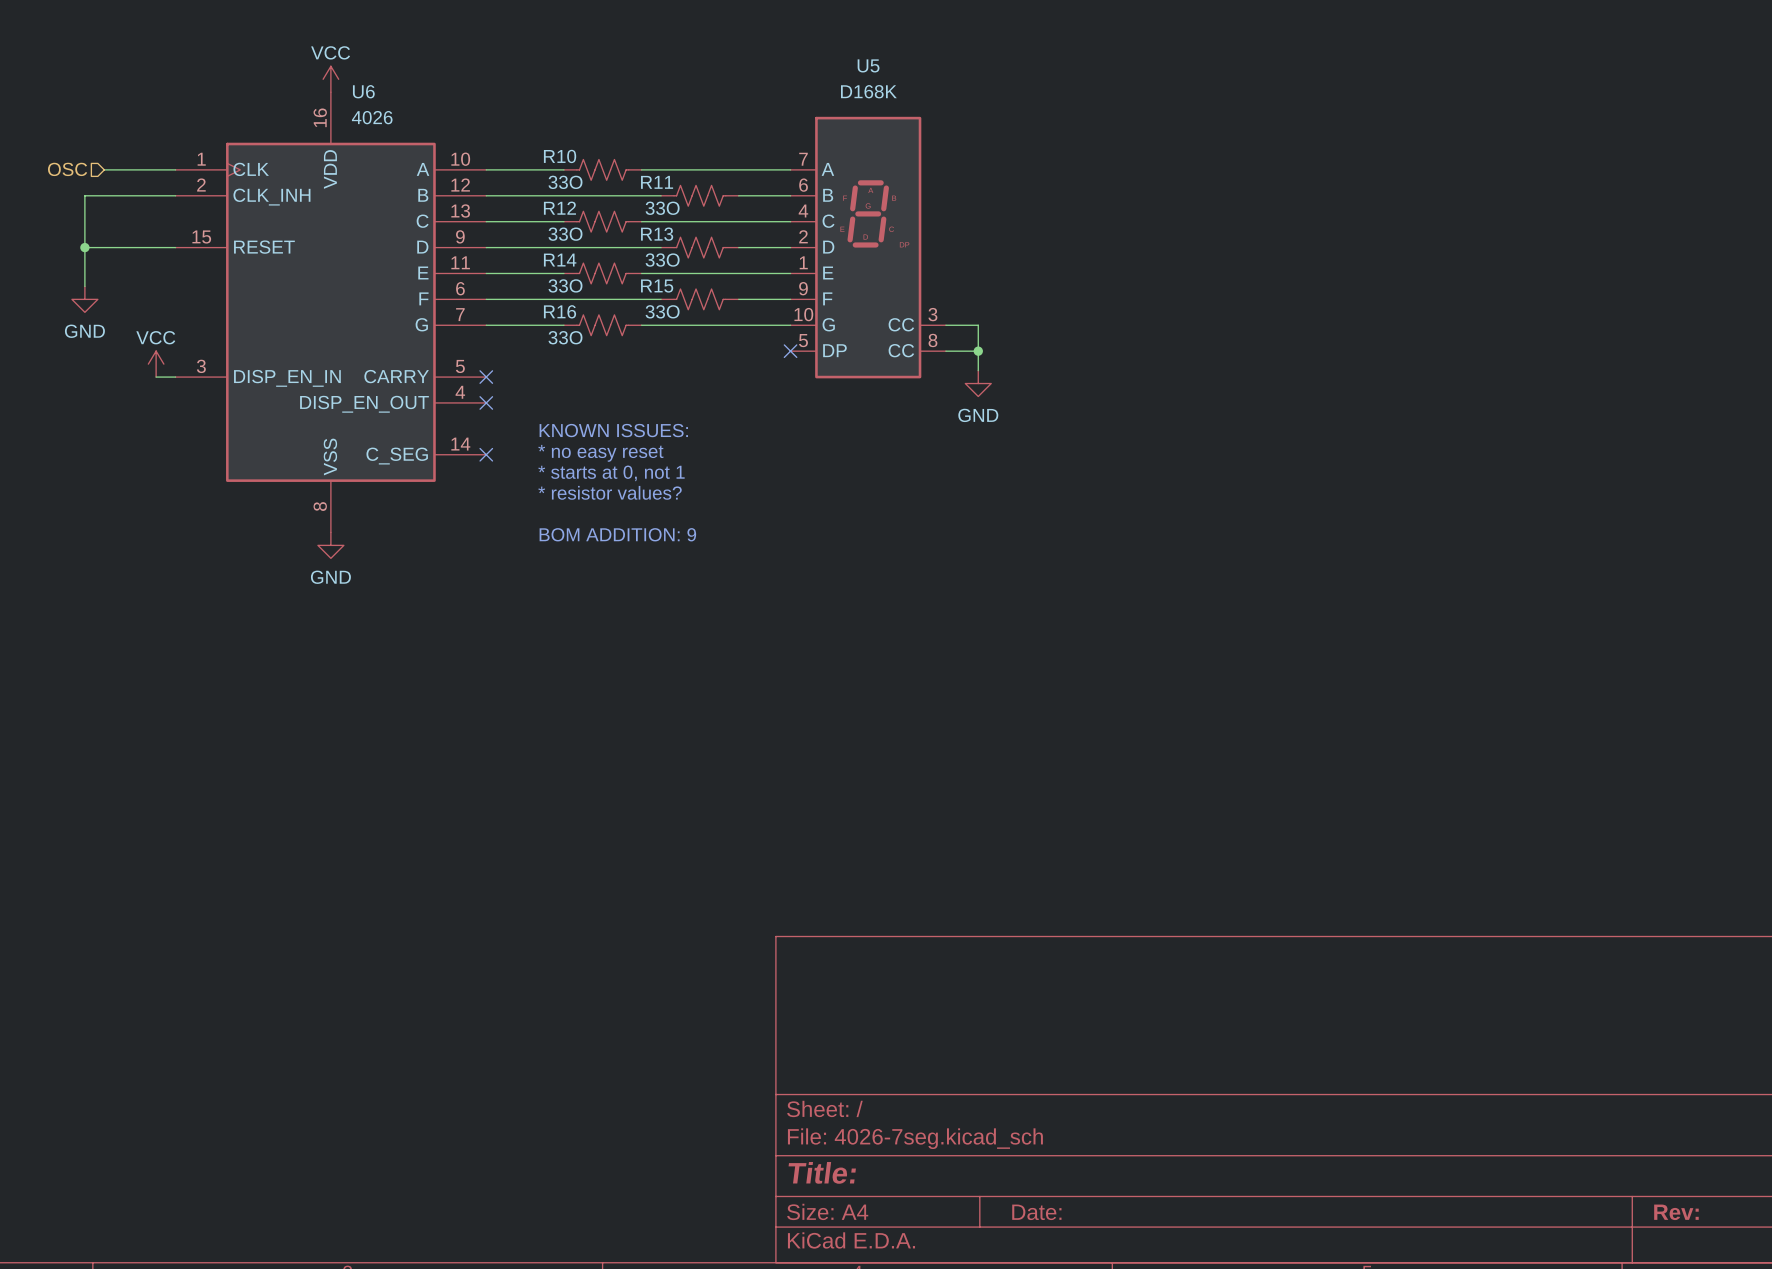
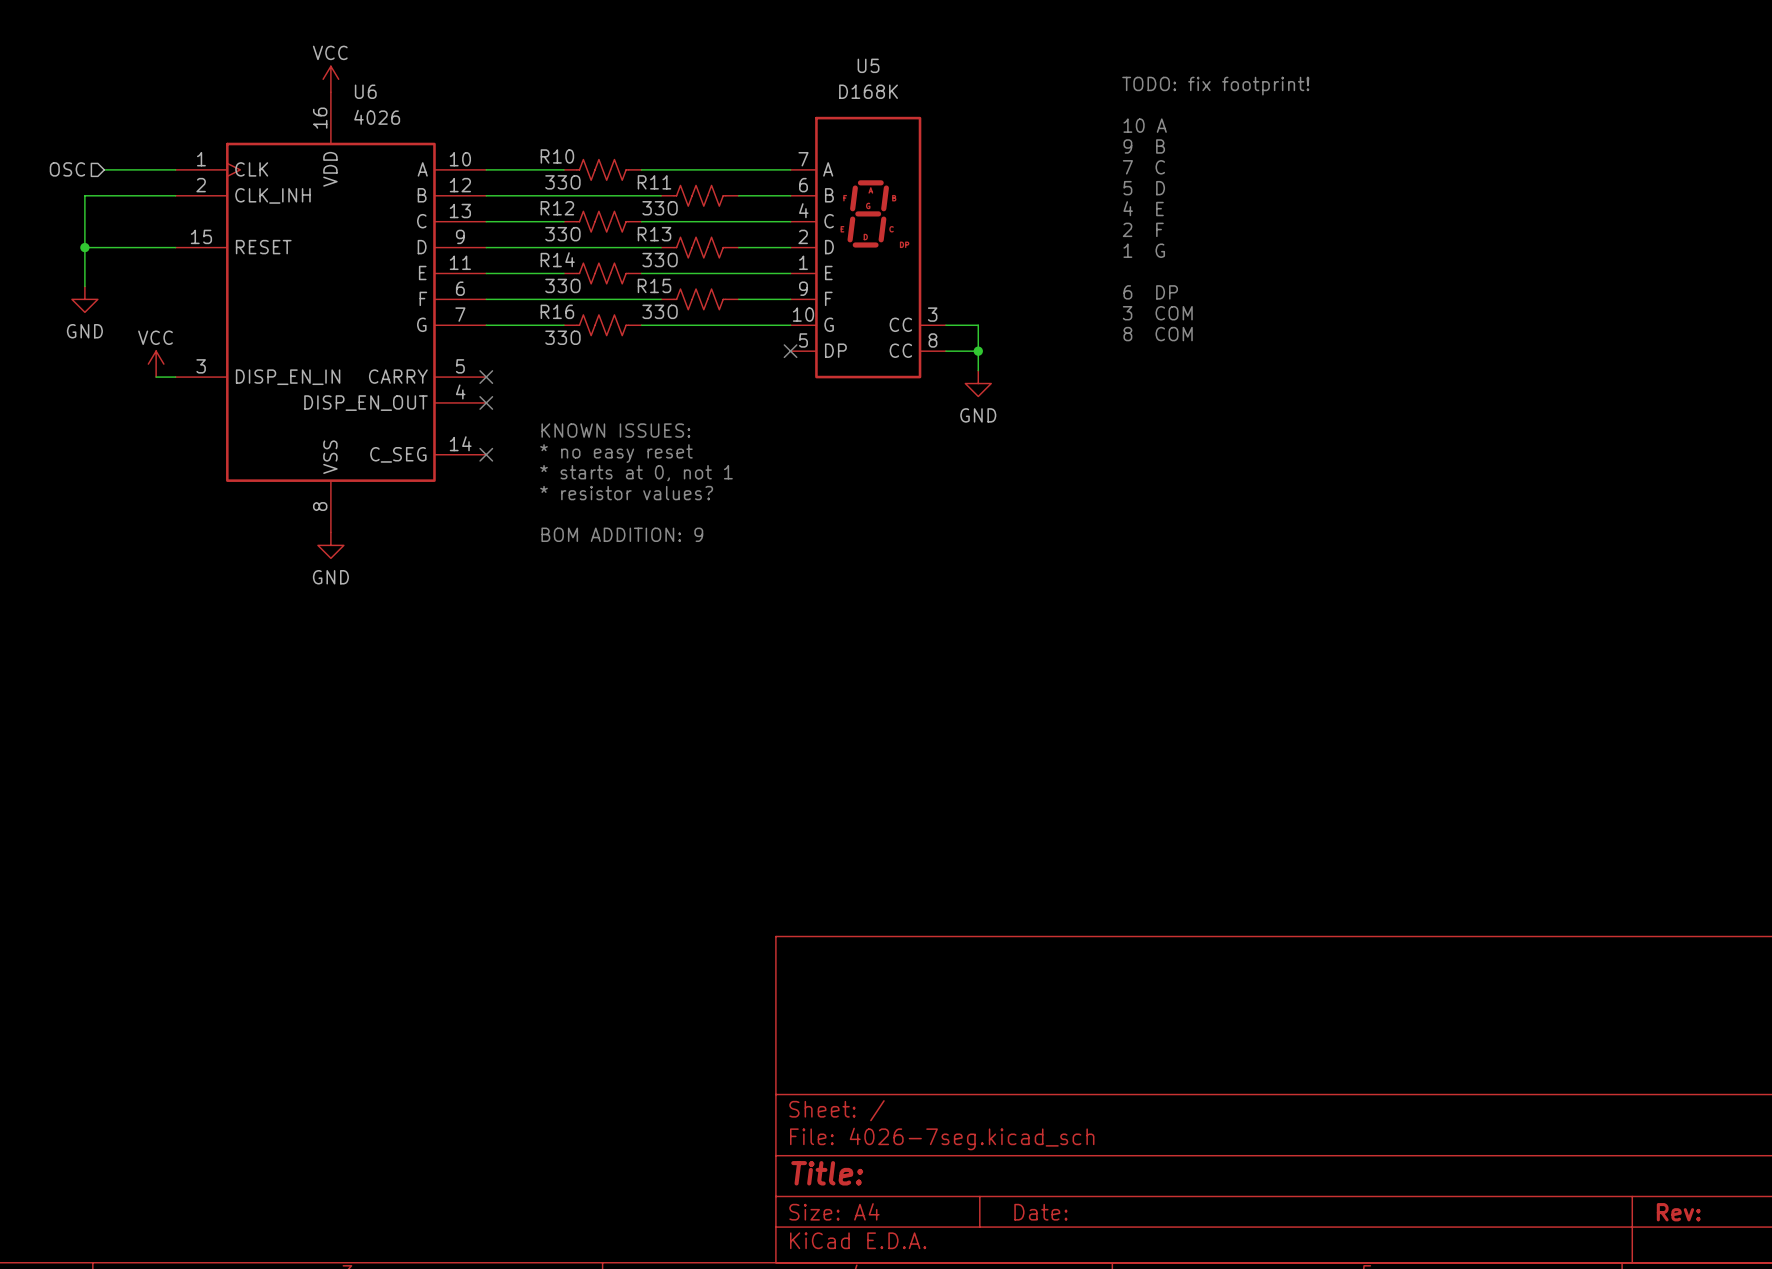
text: none -> TODO: fix footprint! (1215, 86)
text: none -> 10 A (1145, 125)
text: none -> 9 B (1144, 146)
text: none -> 7 C (1143, 167)
text: none -> 5 D (1144, 188)
text: none -> 4 E (1143, 208)
text: none -> 2 F (1143, 229)
text: none -> 1 G (1144, 250)
text: none -> 6 DP (1150, 292)
text: none -> 3 COM (1157, 313)
text: none -> 8 COM (1158, 334)

